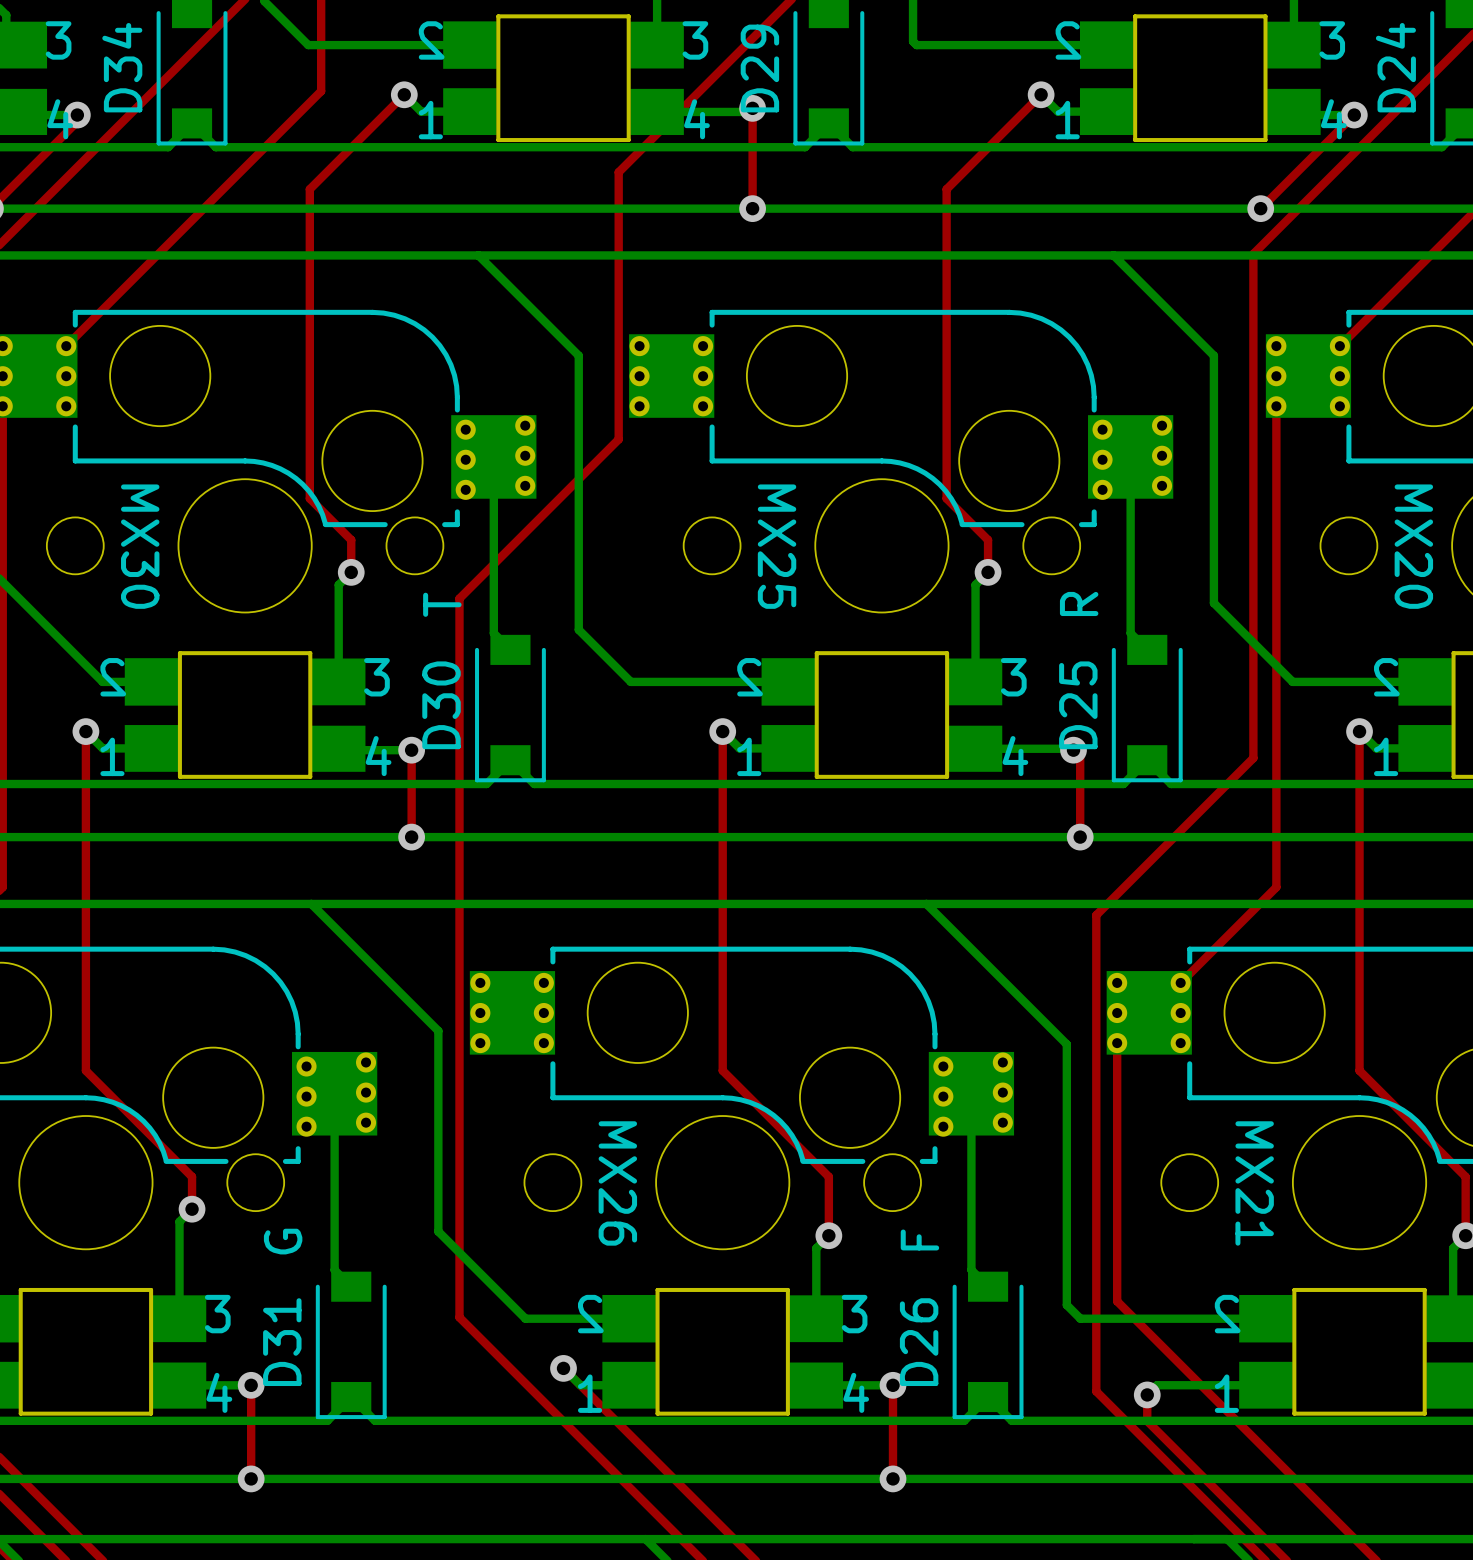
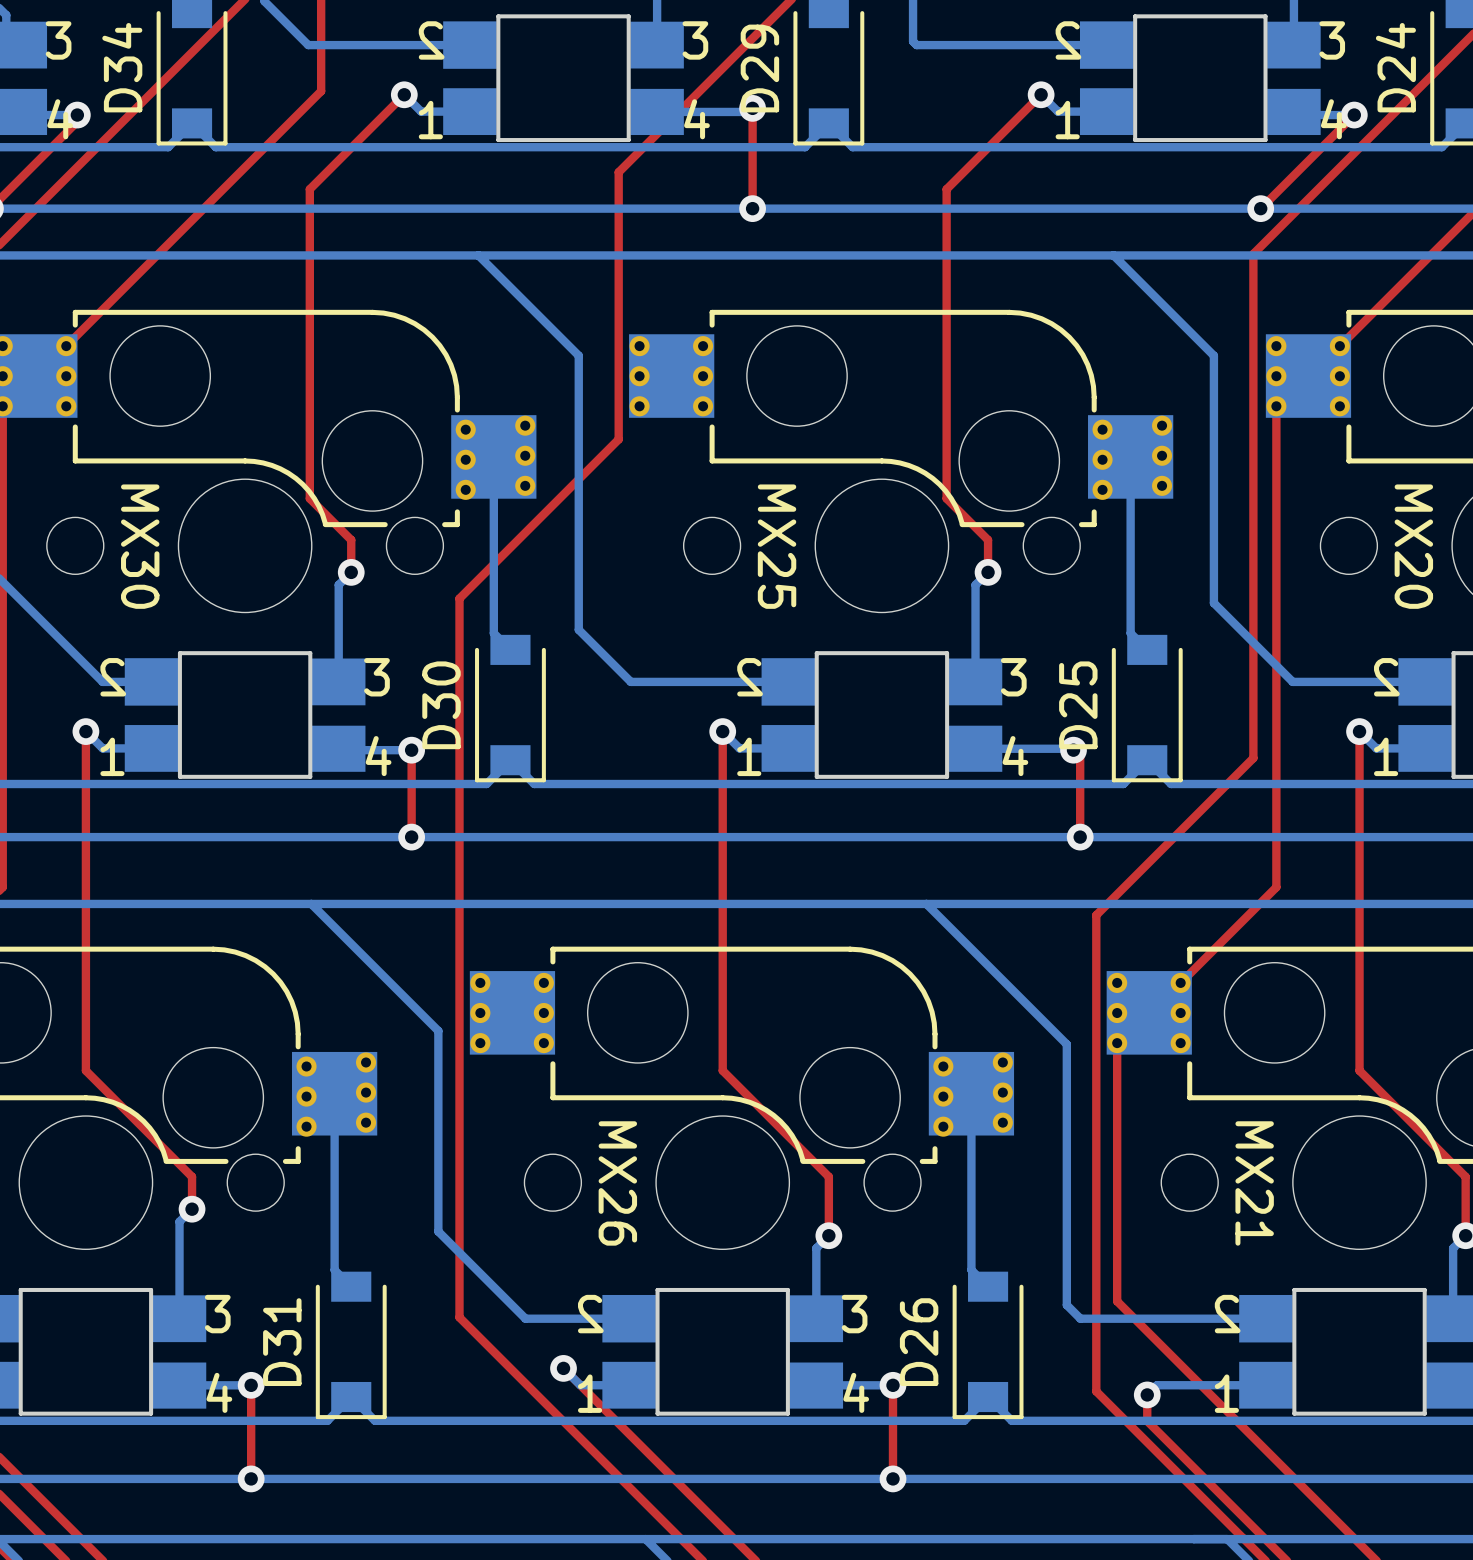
D25 value: R (1079, 603) -> none
D30 value: T (442, 604) -> none
D26 value: F (919, 1239) -> none
D31 value: G (283, 1241) -> none

